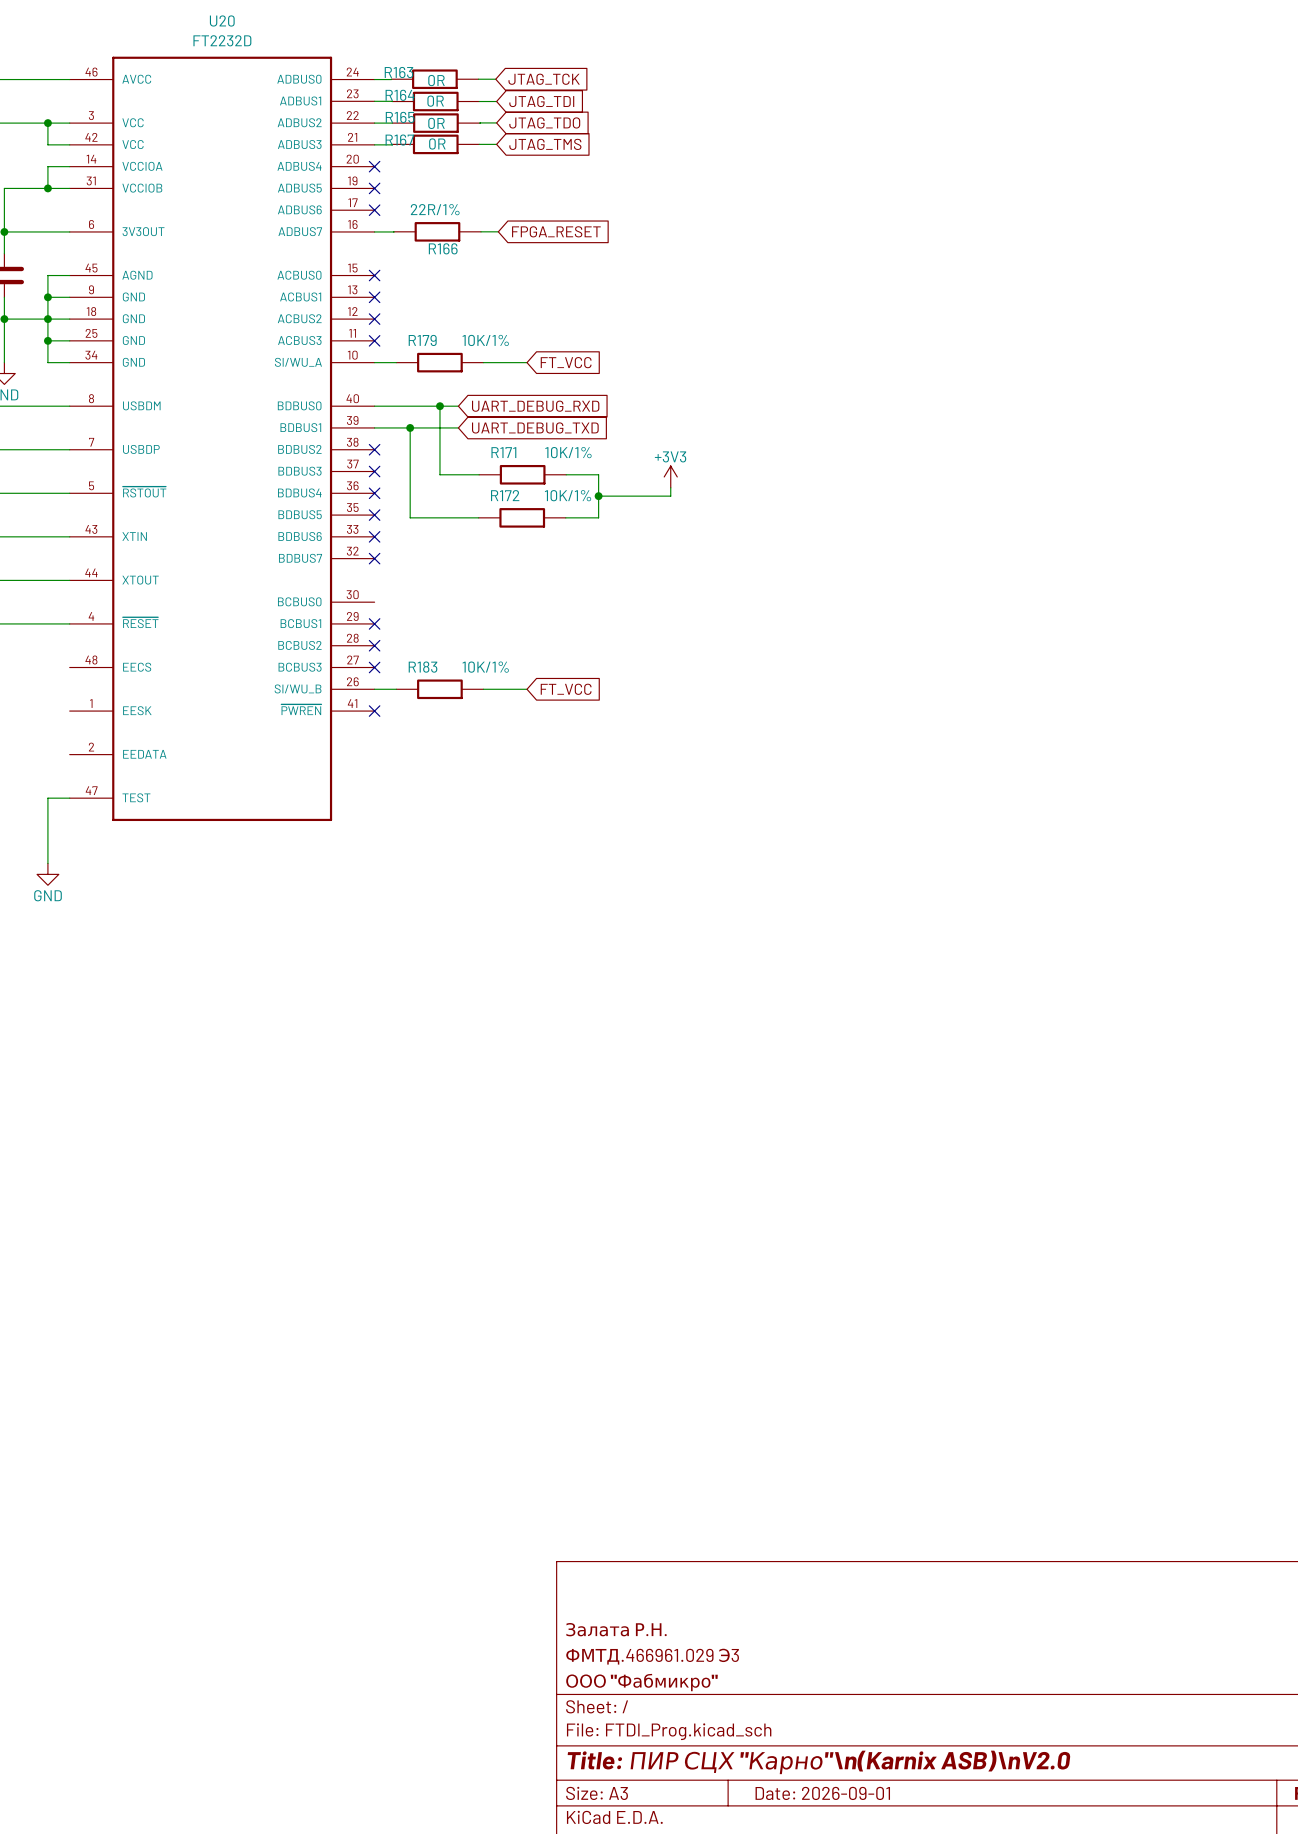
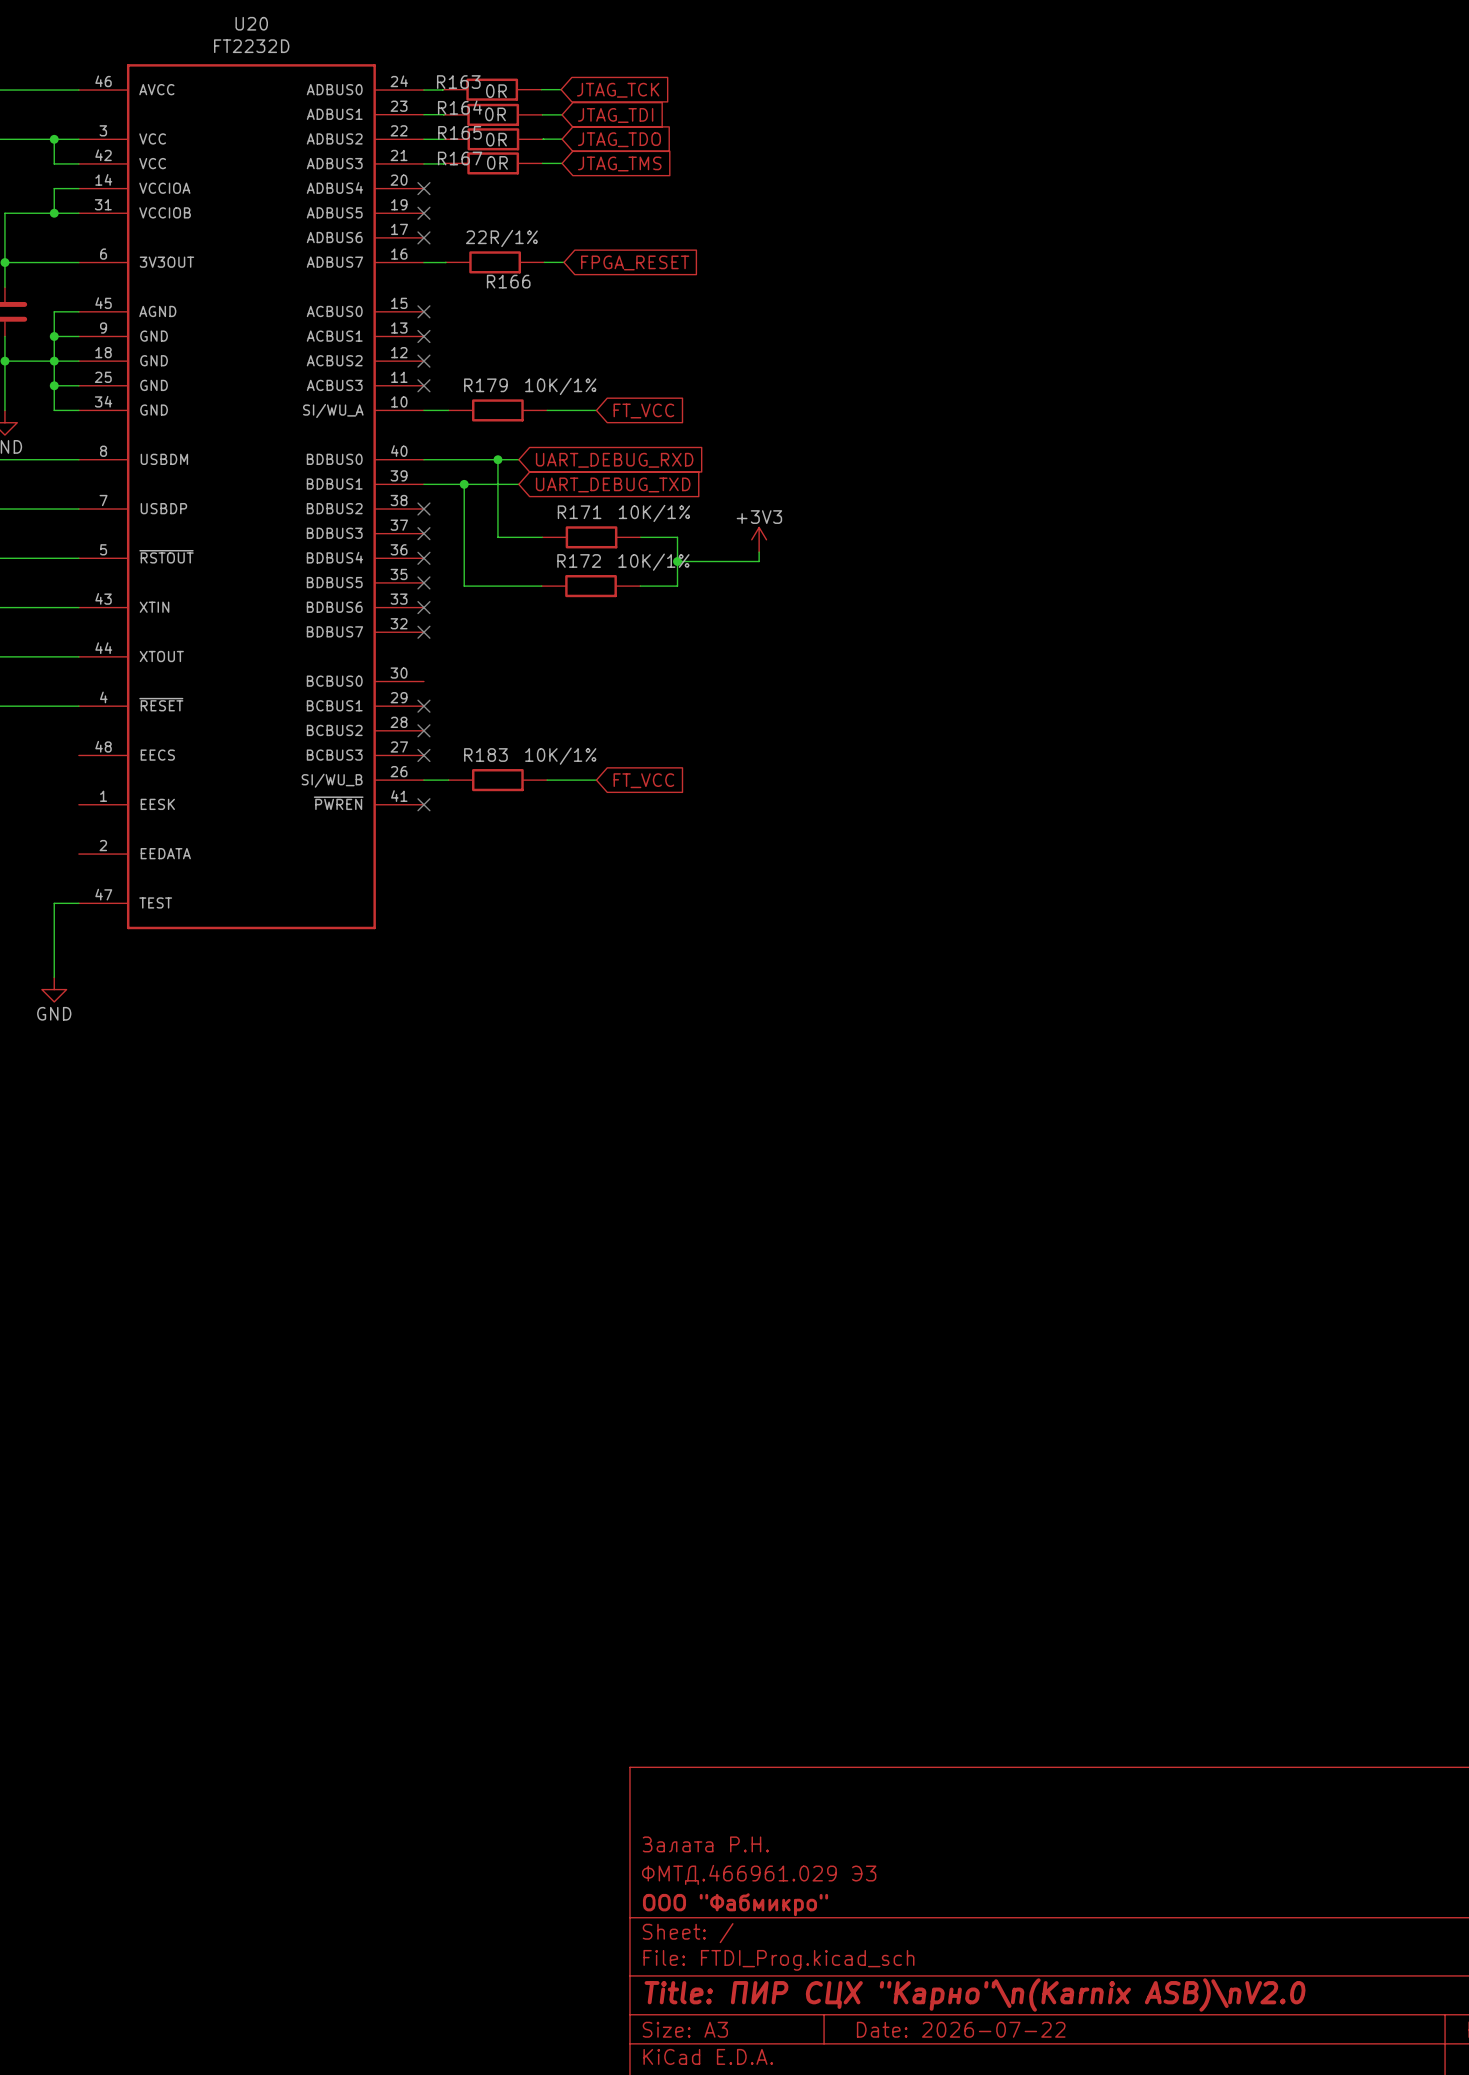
title block: Date: 2026-09-01 (822, 1793) -> Date: 2026-07-22 (961, 2029)

